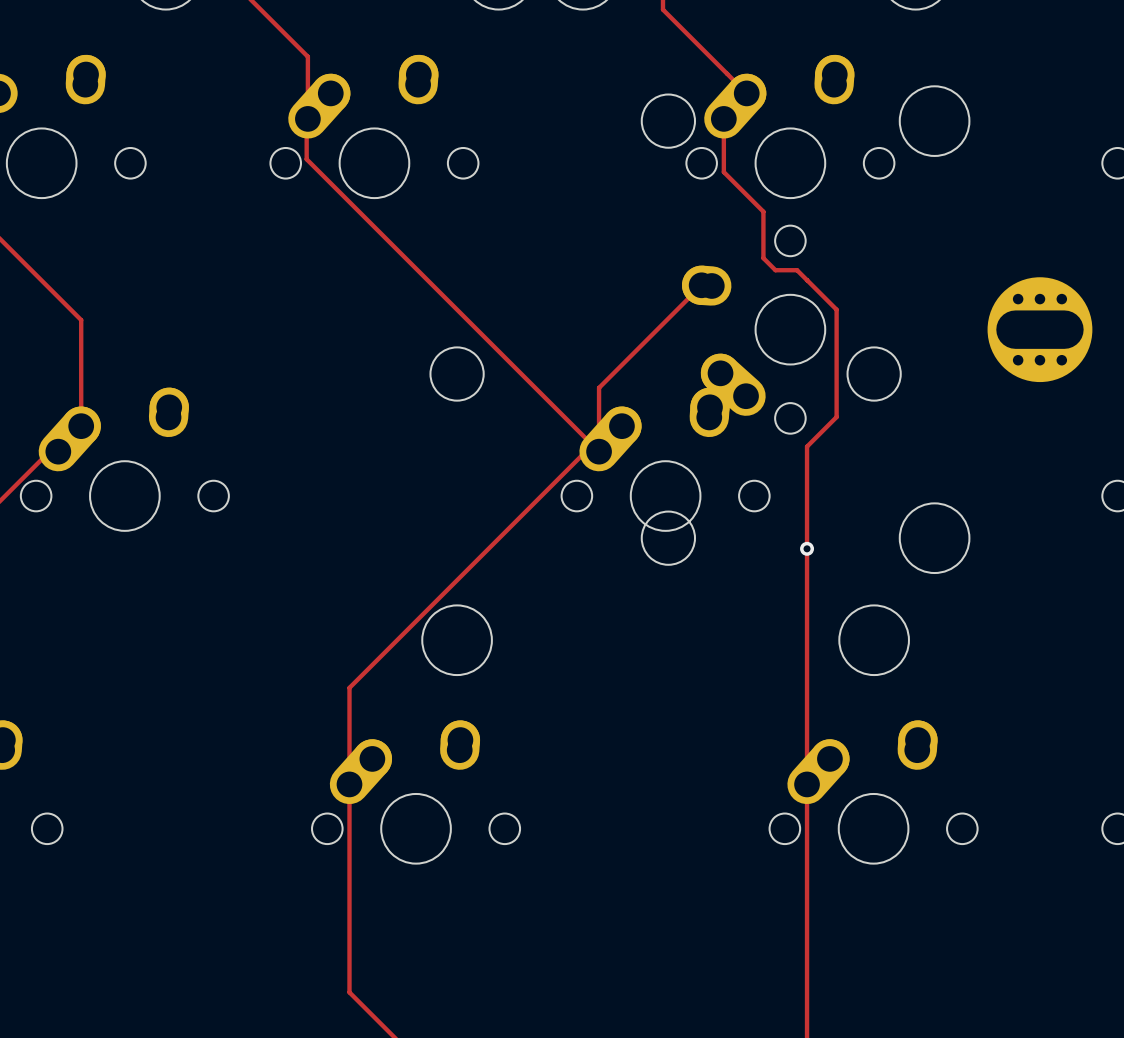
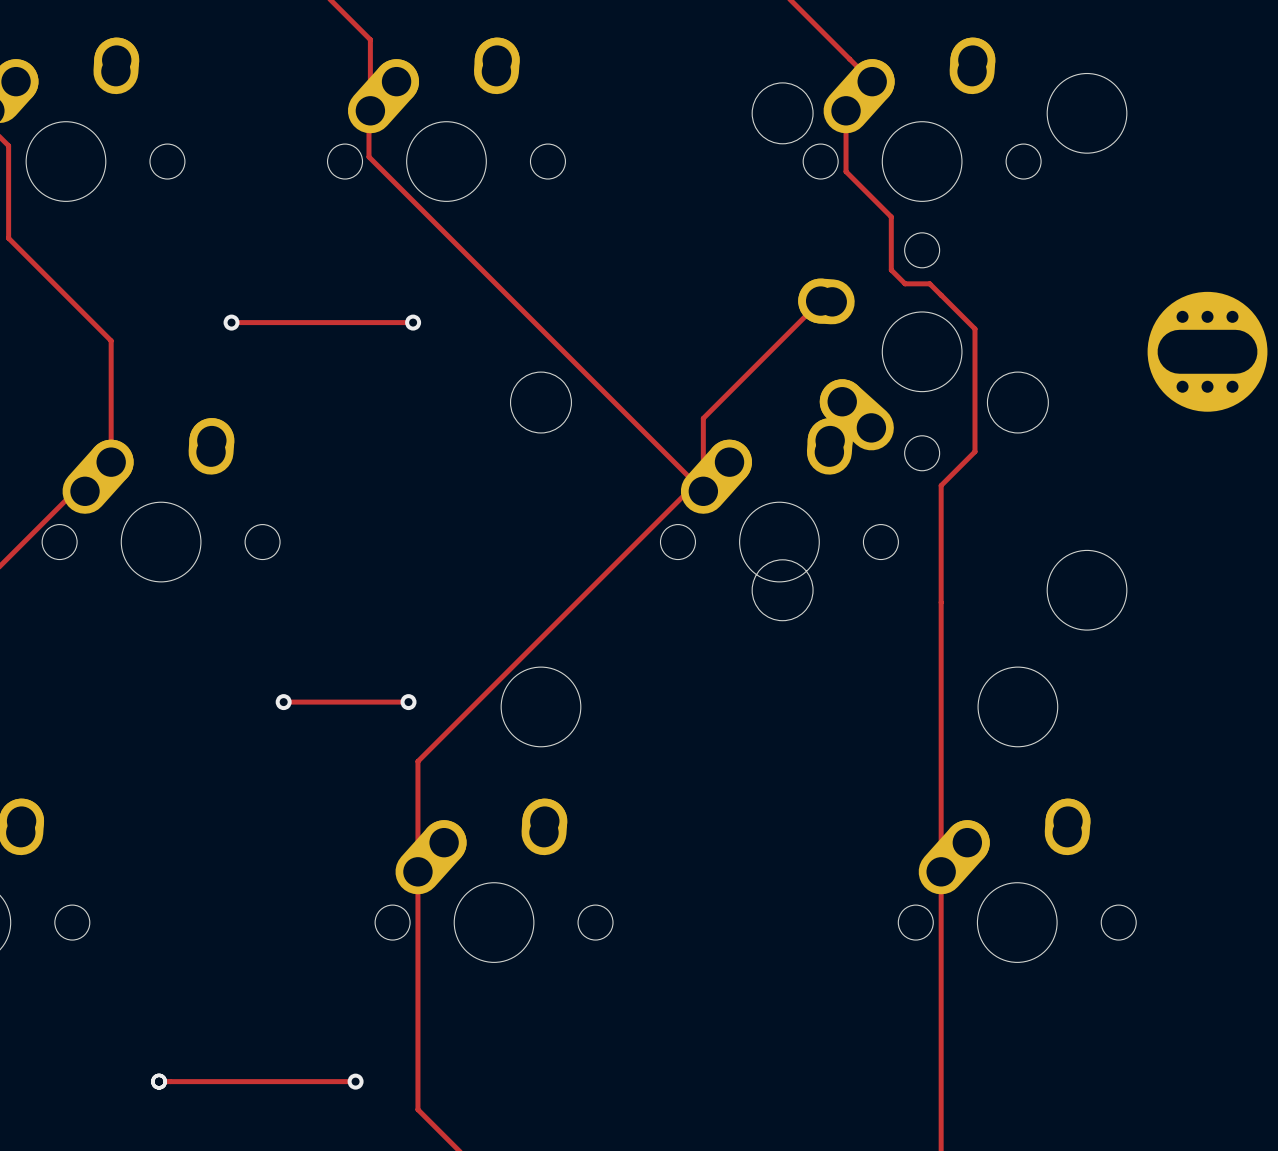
track: none -> (231, 322) (413, 322)
via: none -> (231, 322)
via: none -> (413, 322)
via: (807, 548) -> none
track: none -> (283, 702) (408, 702)
via: none -> (283, 702)
via: none -> (408, 702)
track: none -> (159, 1081) (355, 1081)
via: none -> (159, 1081)
via: none -> (355, 1081)

